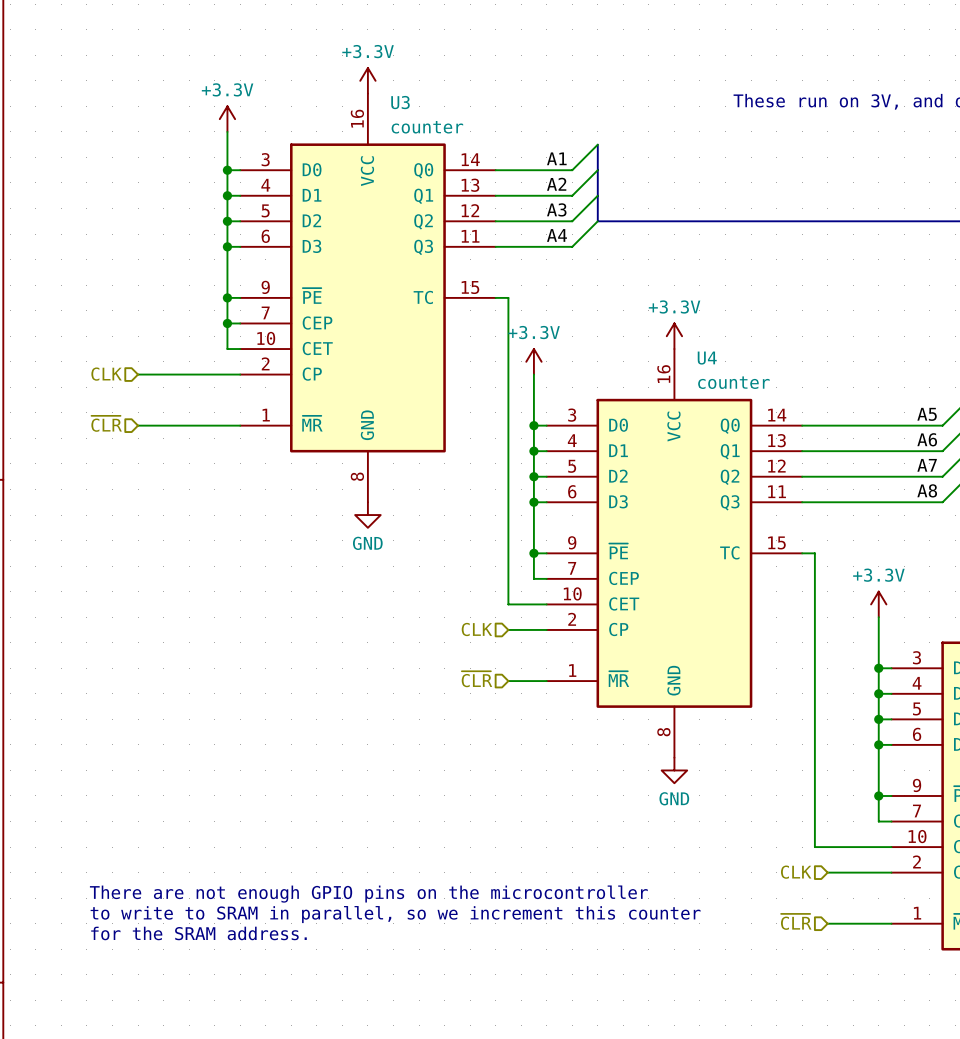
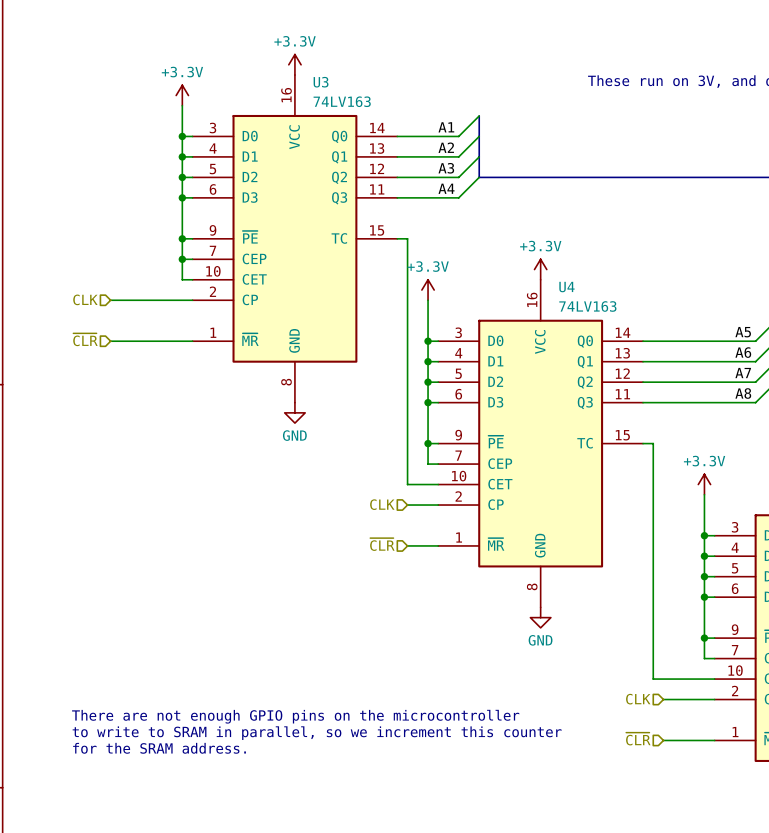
U3 value: counter (427, 127) -> 74LV163 (342, 101)
U4 value: counter (733, 382) -> 74LV163 (587, 306)

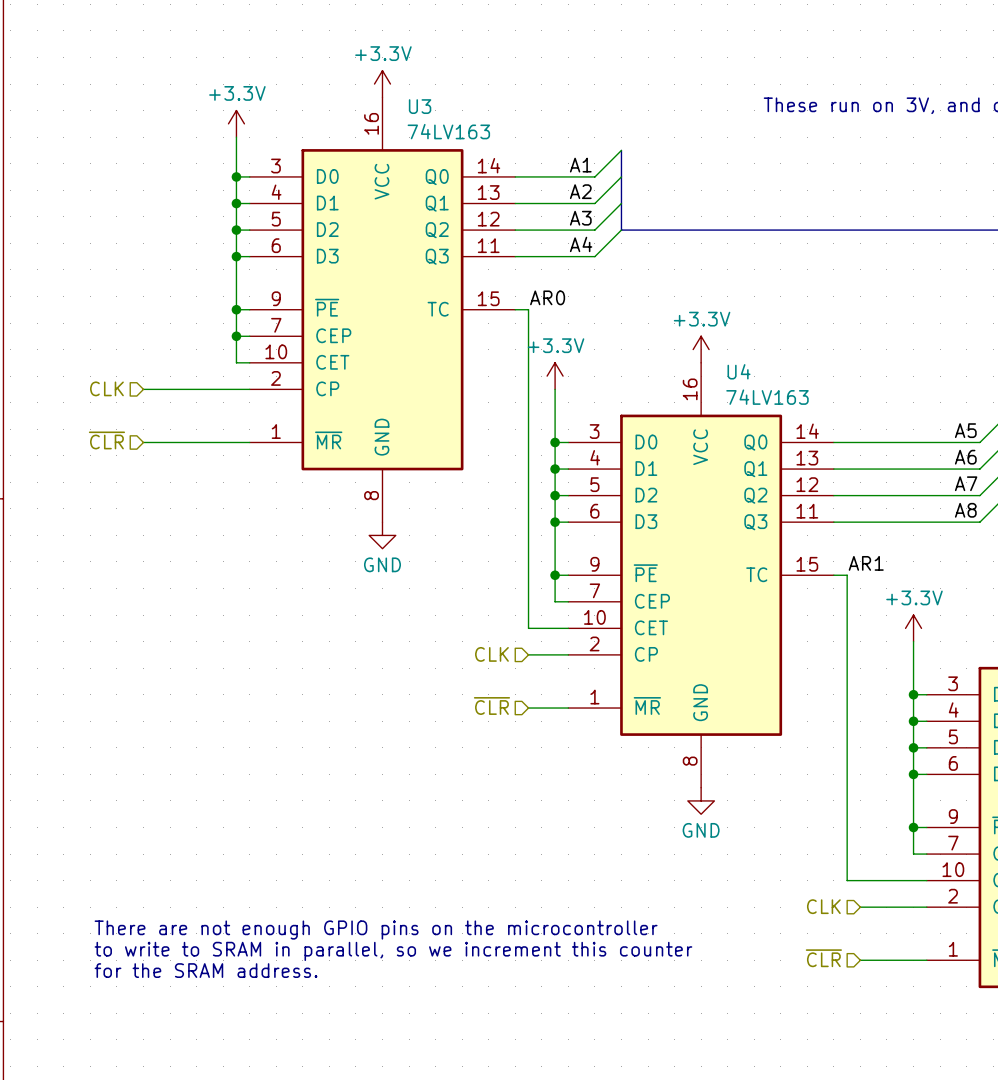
label: none -> AR0 (547, 297)
label: none -> AR1 (866, 563)

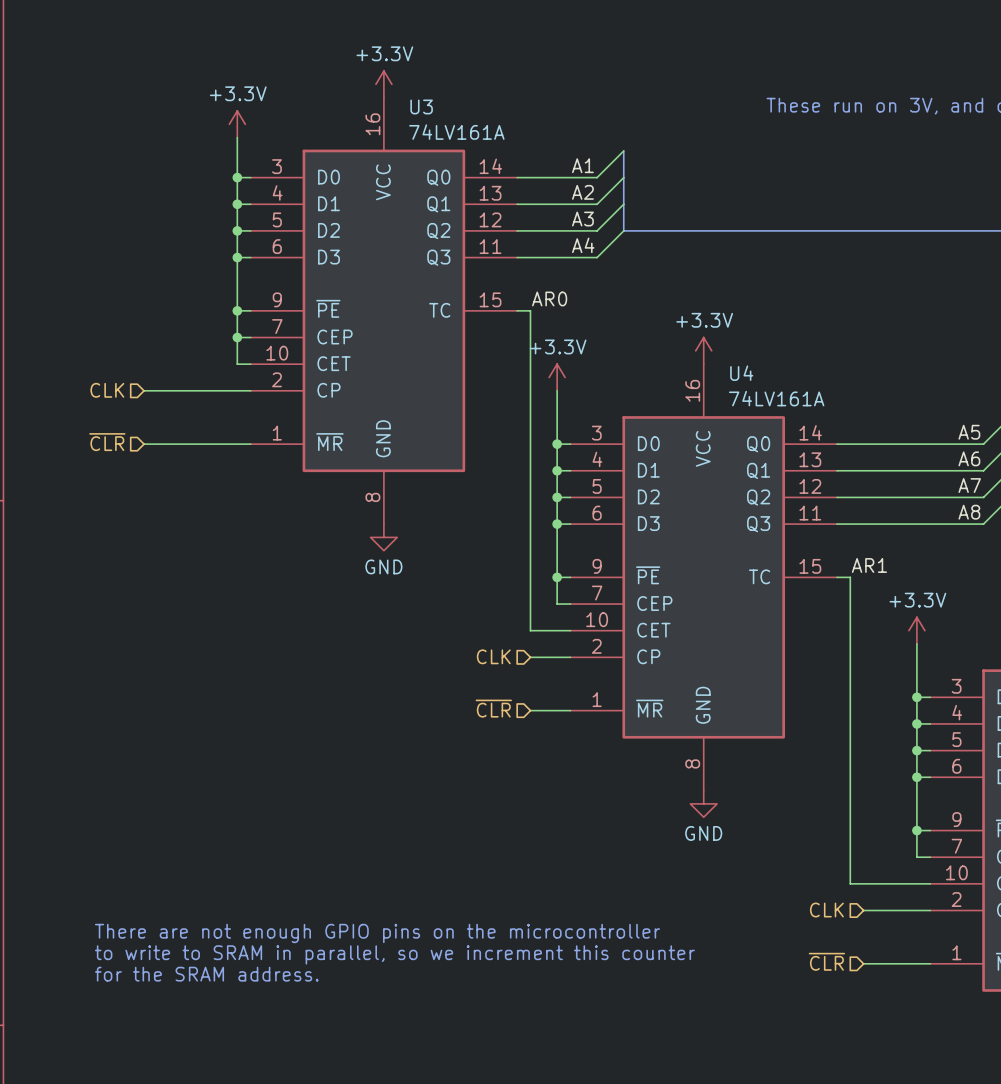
U3 value: 74LV163 (448, 131) -> 74LV161A (456, 132)
U4 value: 74LV163 (767, 397) -> 74LV161A (776, 398)

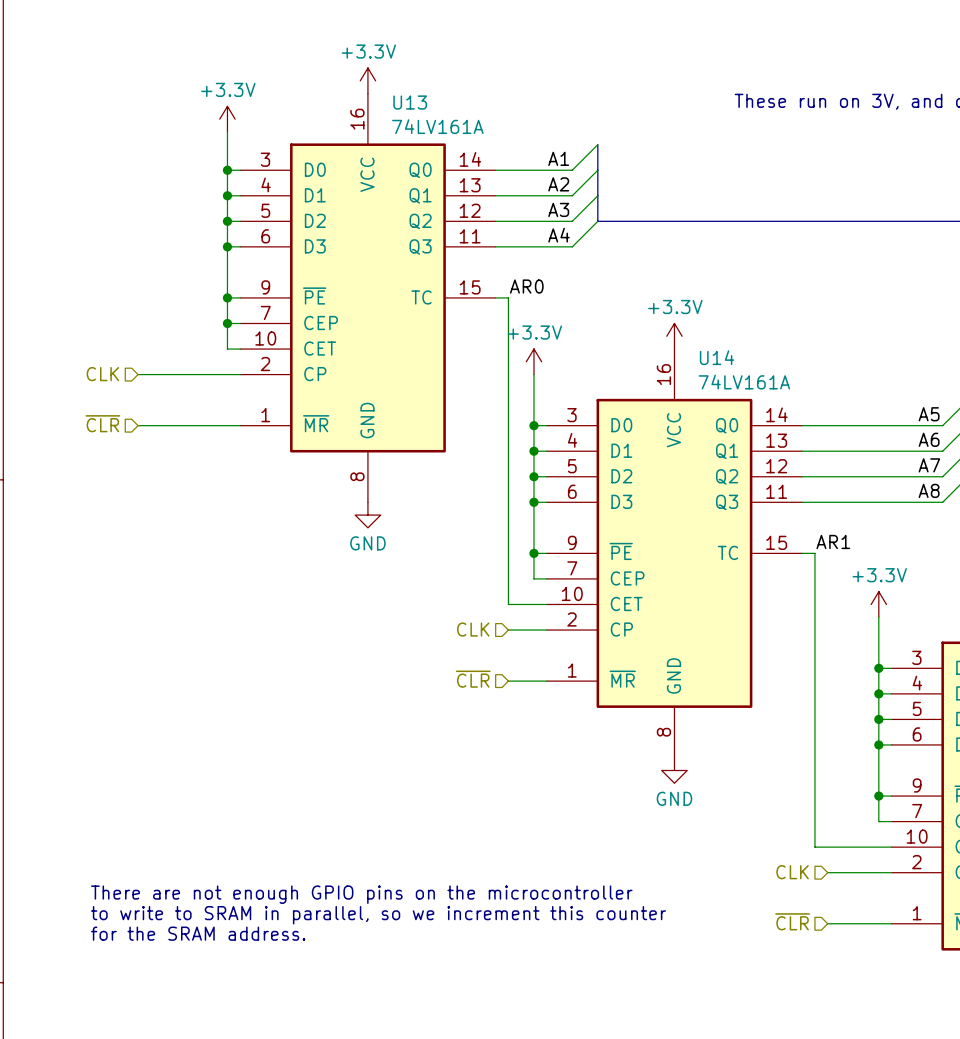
U3 name: U3 (421, 106) -> U13 (410, 102)
U4 name: U4 (741, 373) -> U14 (717, 357)

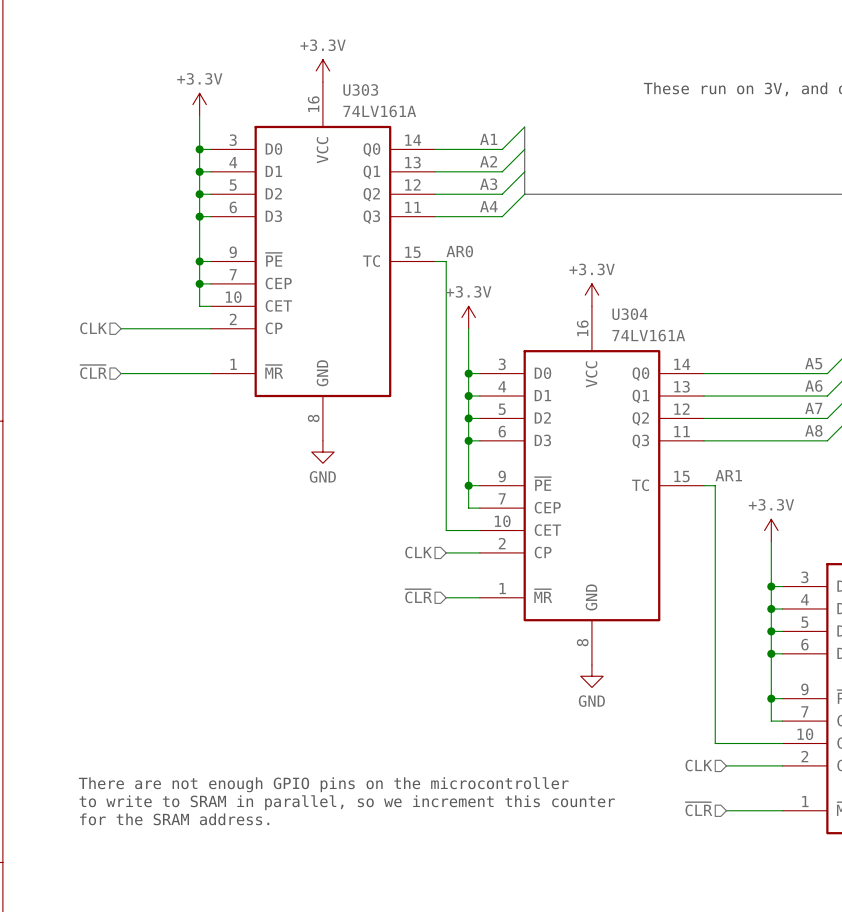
U13 name: U13 (410, 102) -> U303 (360, 90)
U14 name: U14 (717, 357) -> U304 (630, 314)

